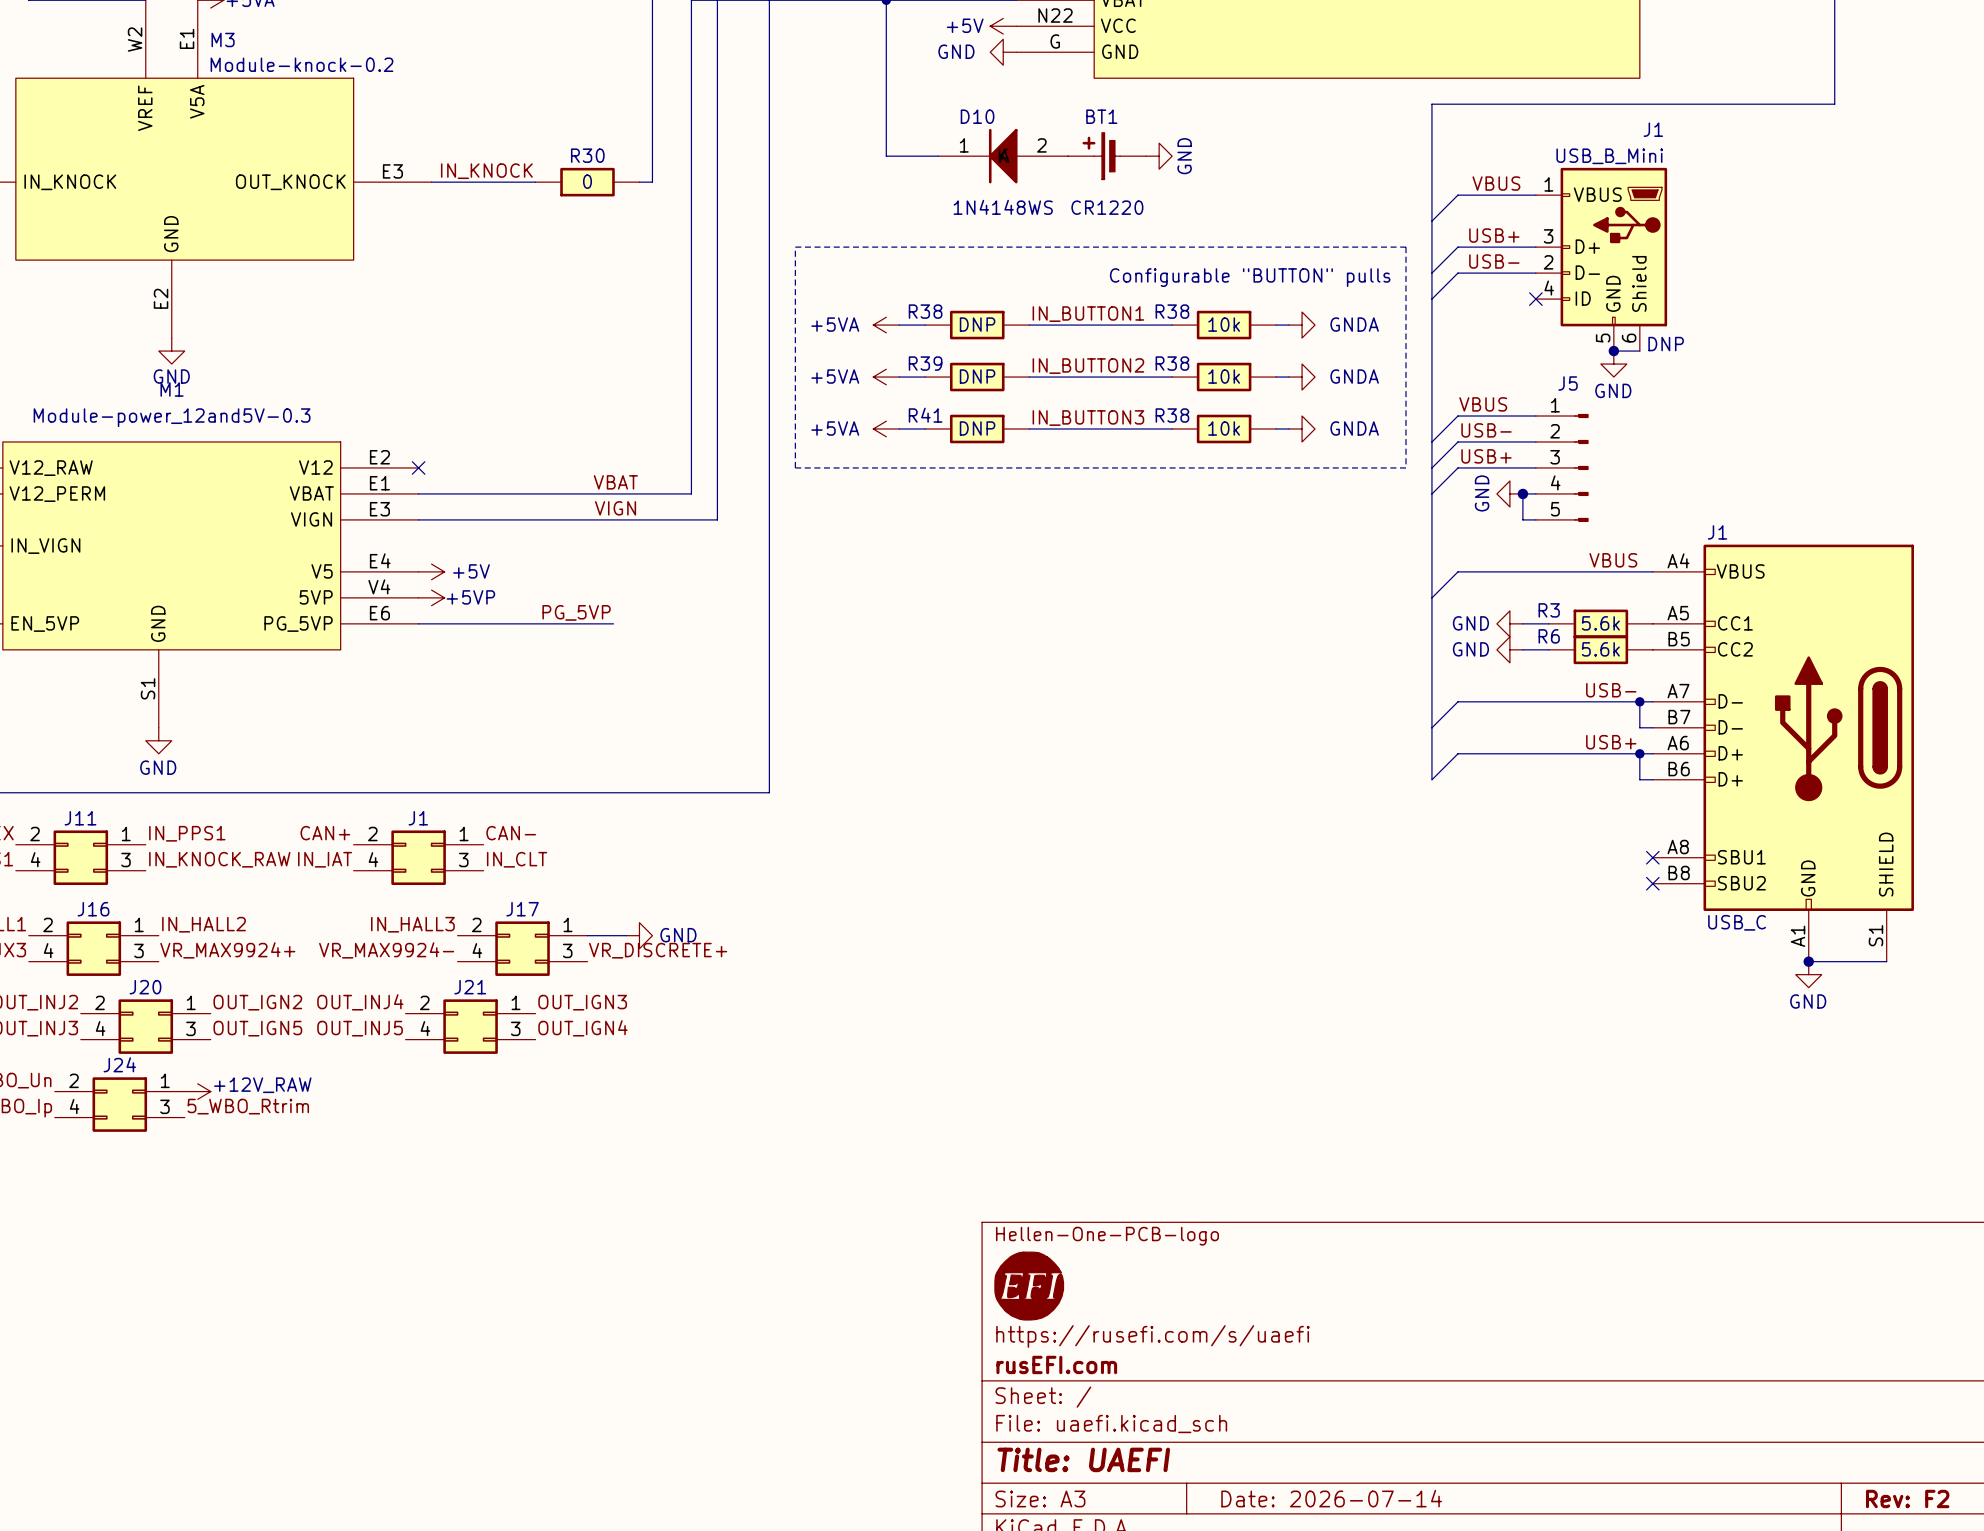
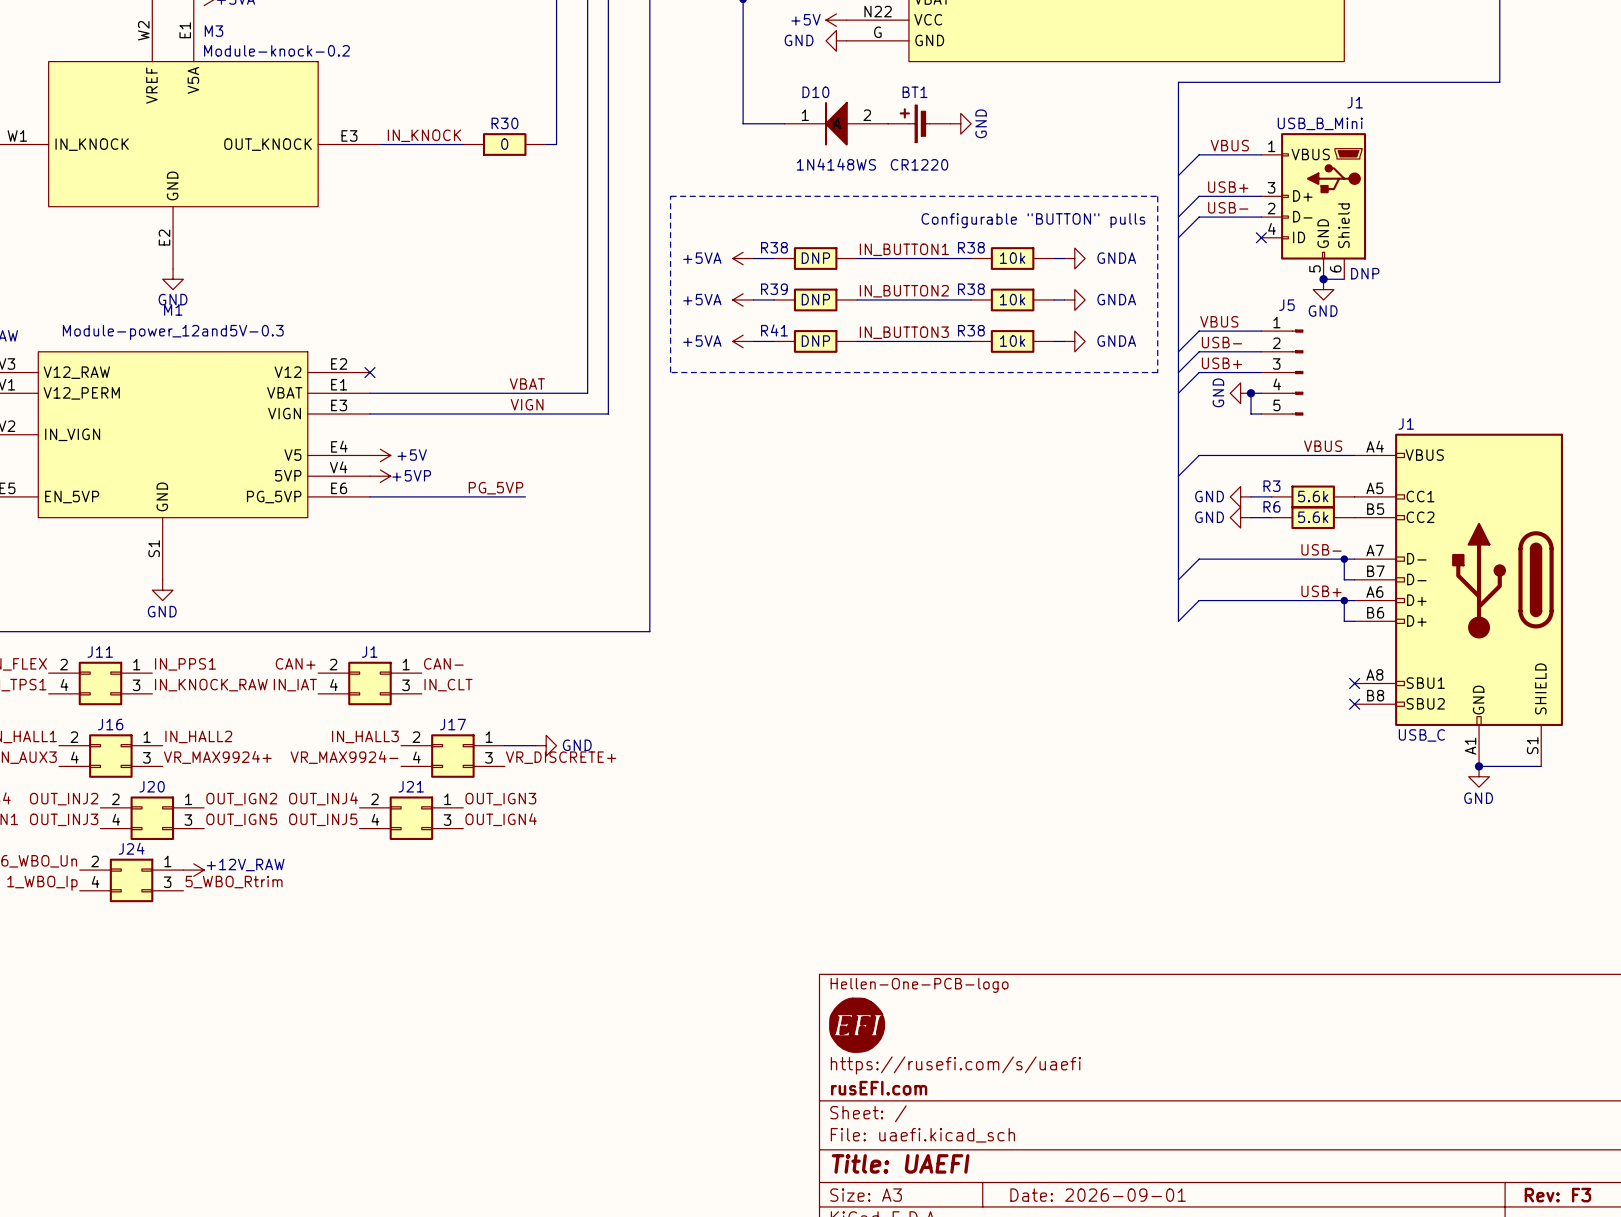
title block: Date: 2026-07-14 (1331, 1498) -> Date: 2026-09-01 (1098, 1195)
title block: Rev: F2 (1907, 1498) -> Rev: F3 (1557, 1195)

